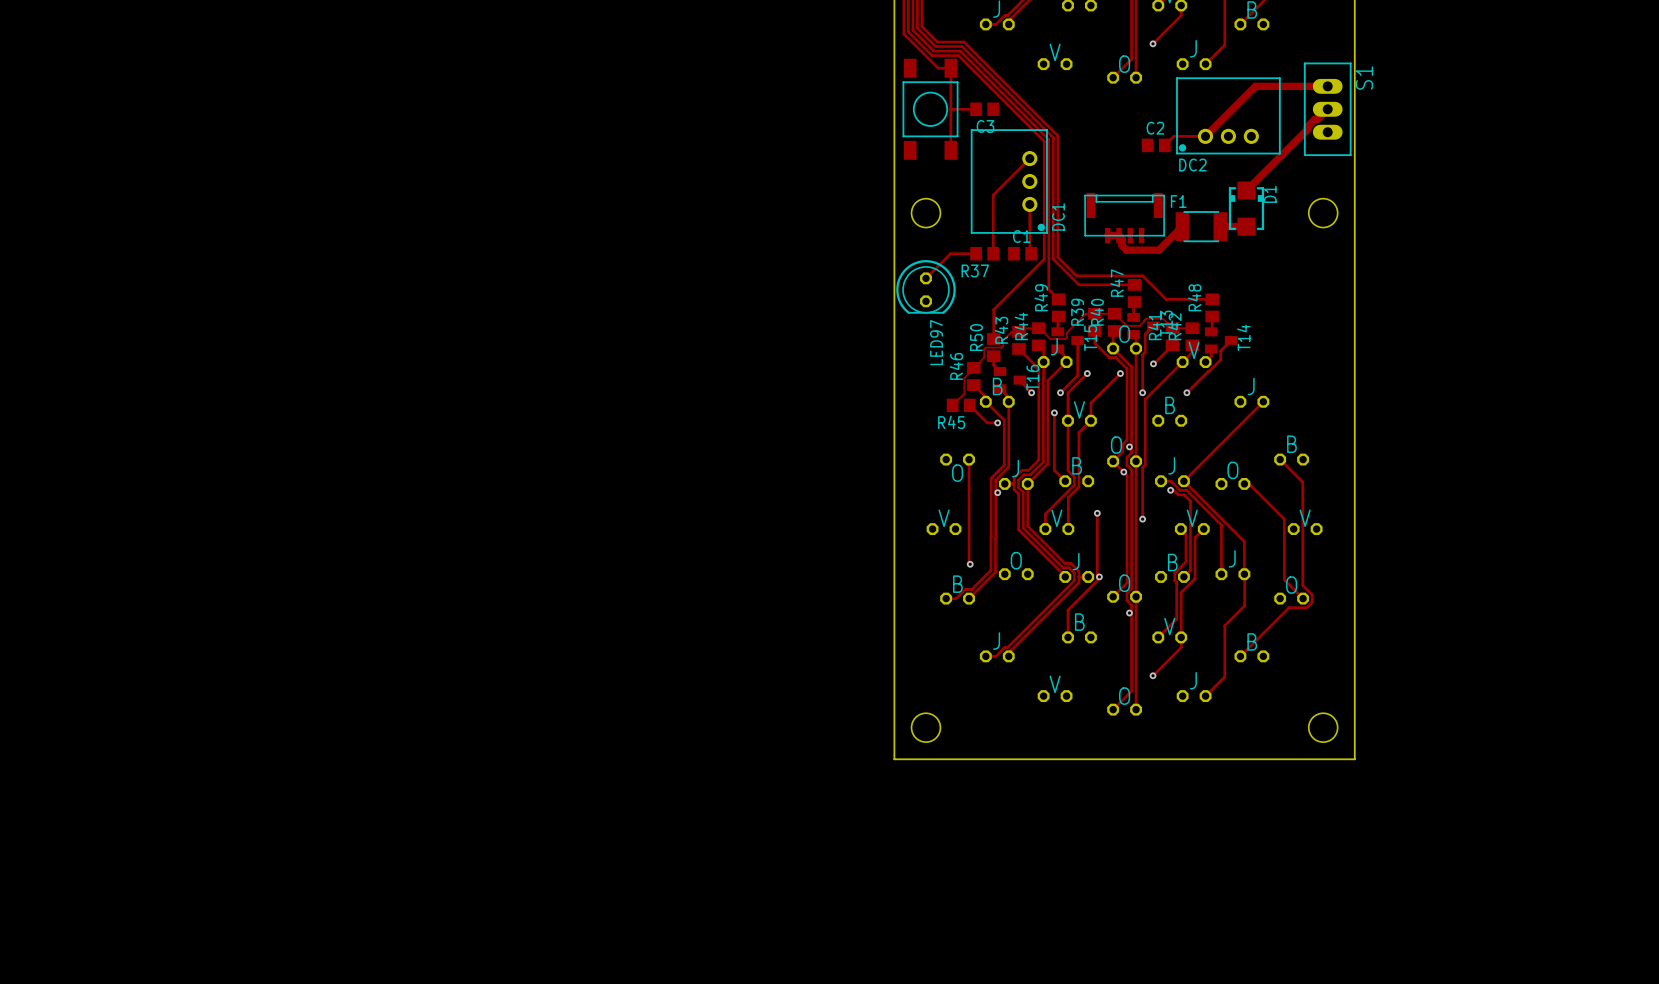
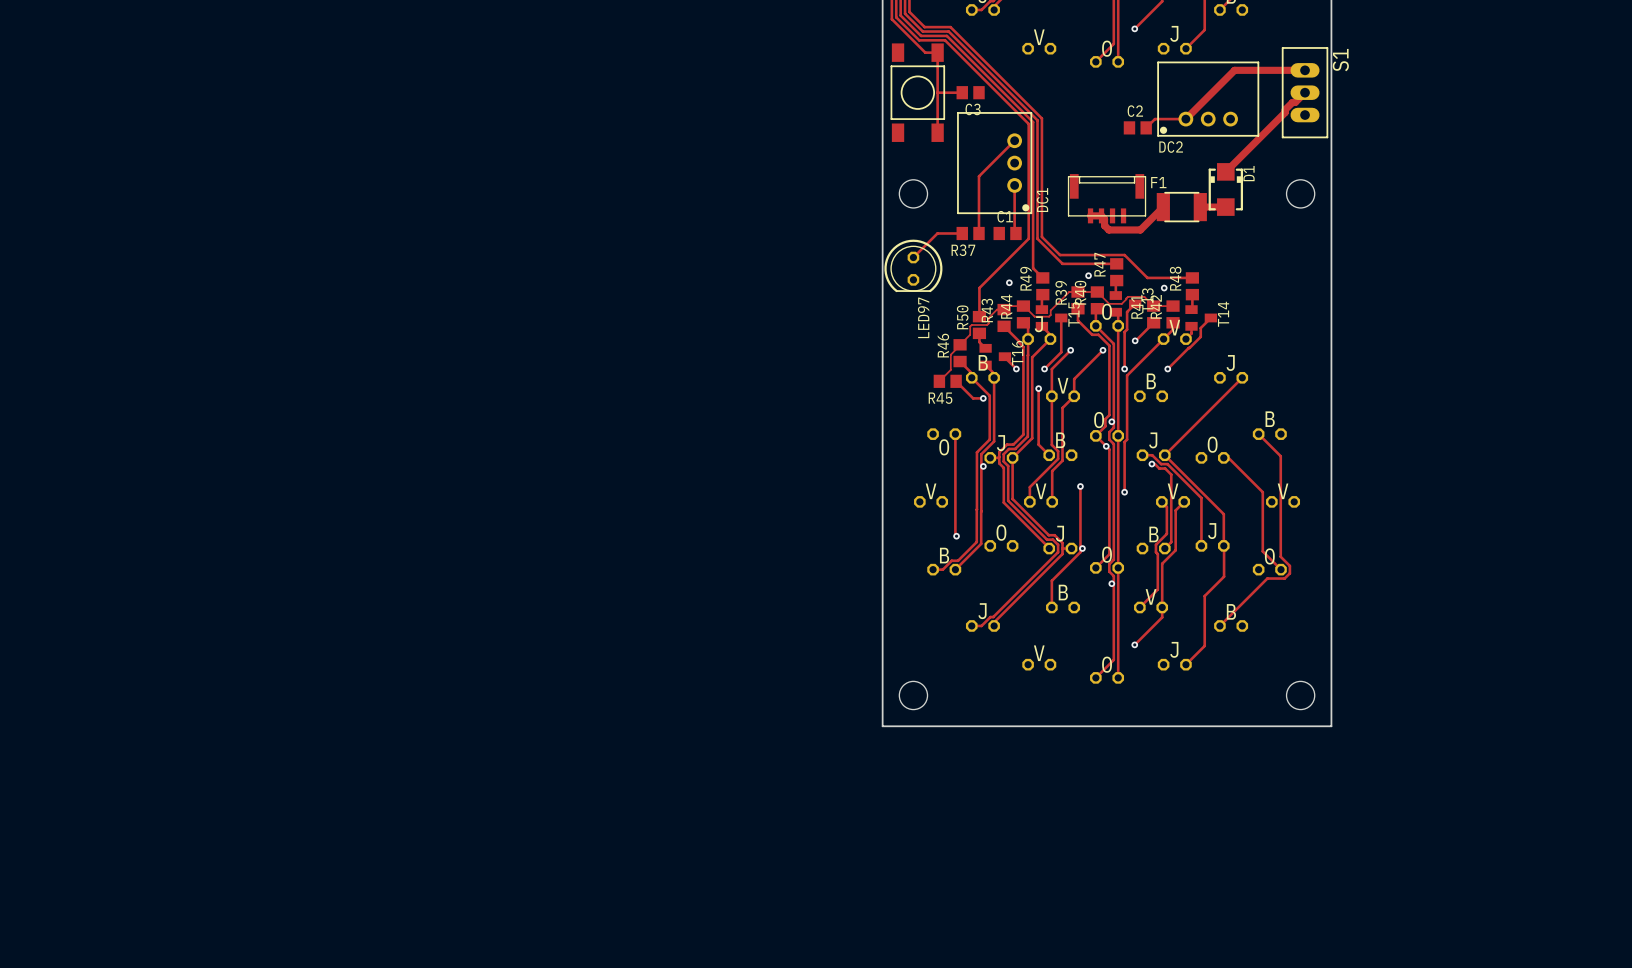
via: none -> (1088, 275)
via: none -> (1009, 282)
via: none -> (1164, 288)

